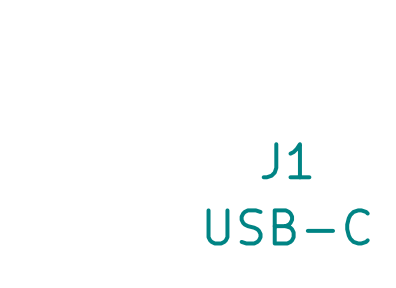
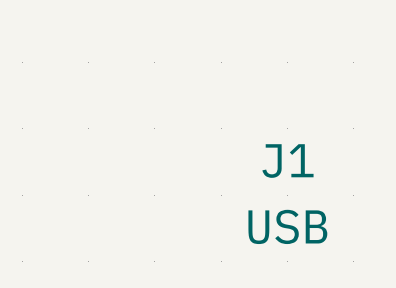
J1 value: USB-C (288, 226) -> USB (287, 226)

